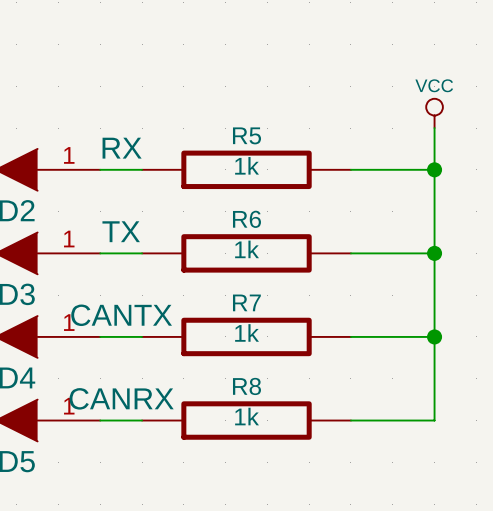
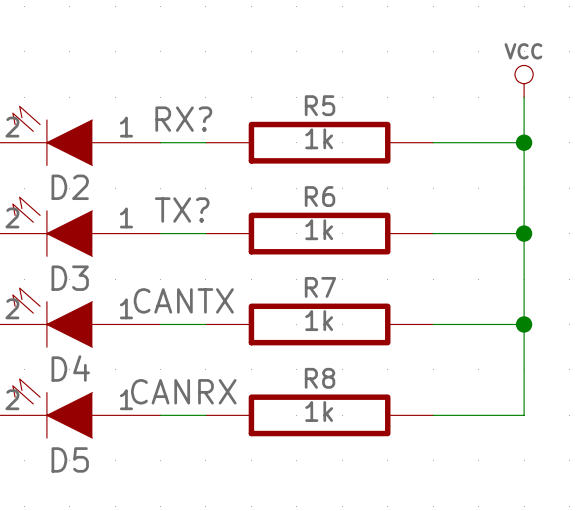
D2 value: RX (122, 148) -> RX? (183, 119)
D3 value: TX (121, 231) -> TX? (182, 210)

